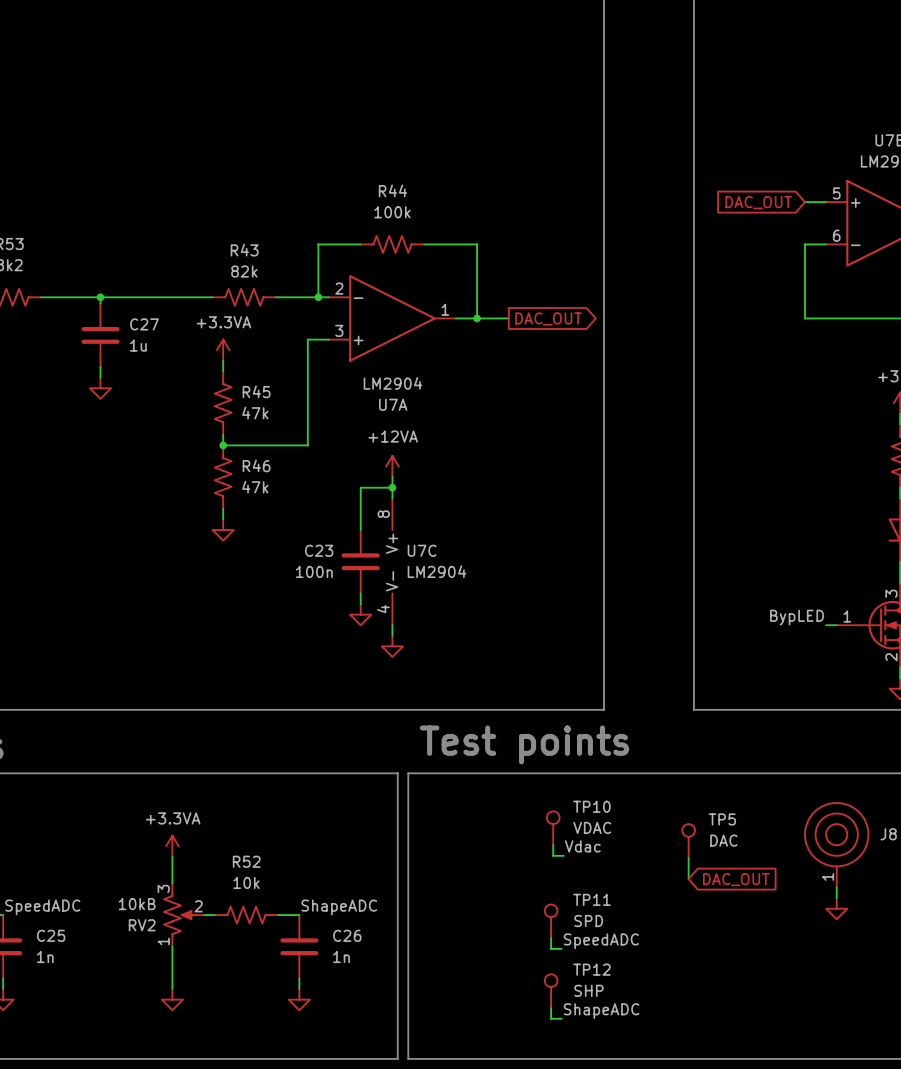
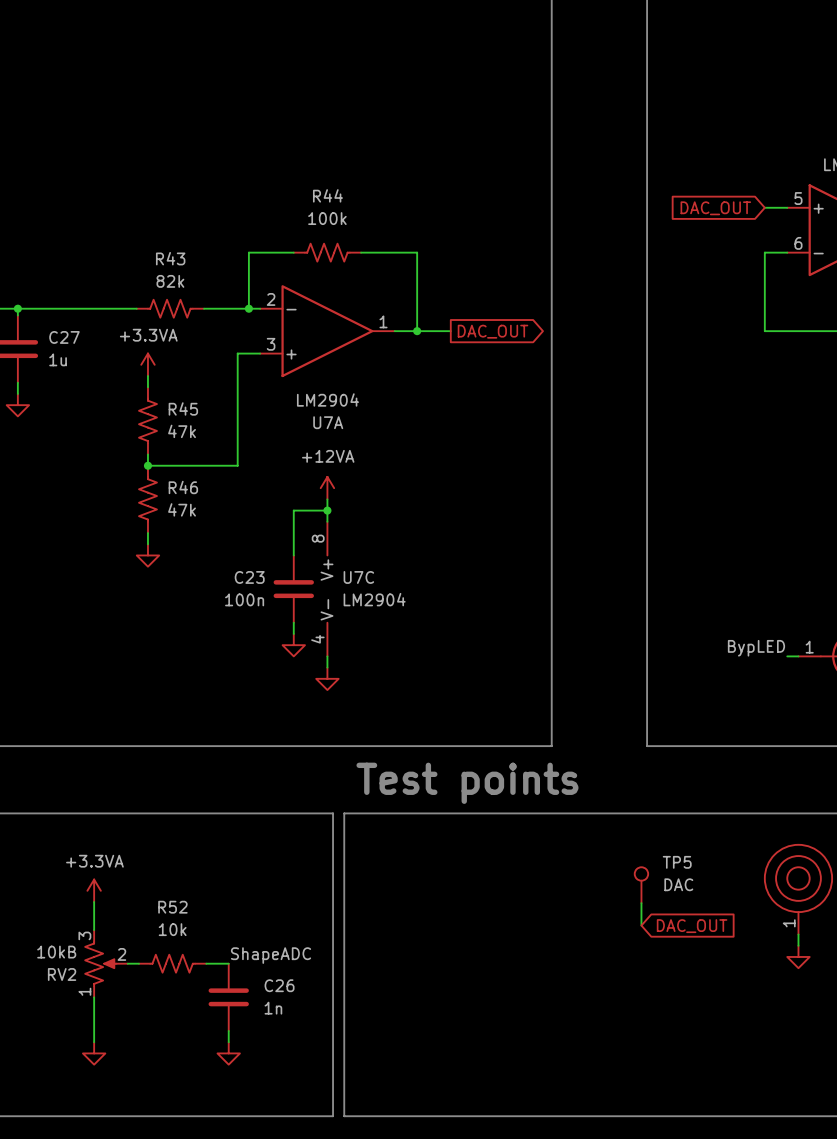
TP10: VDAC (553, 828) -> none
wire: (553, 845) (553, 855) (563, 855) -> none
label: Vdac (582, 846) -> none
TP11: SPD (551, 921) -> none
wire: (551, 938) (551, 948) (561, 948) -> none
label: SpeedADC (601, 941) -> none
TP12: SHP (551, 991) -> none
wire: (551, 1008) (551, 1018) (561, 1018) -> none
label: ShapeADC (601, 1011) -> none

